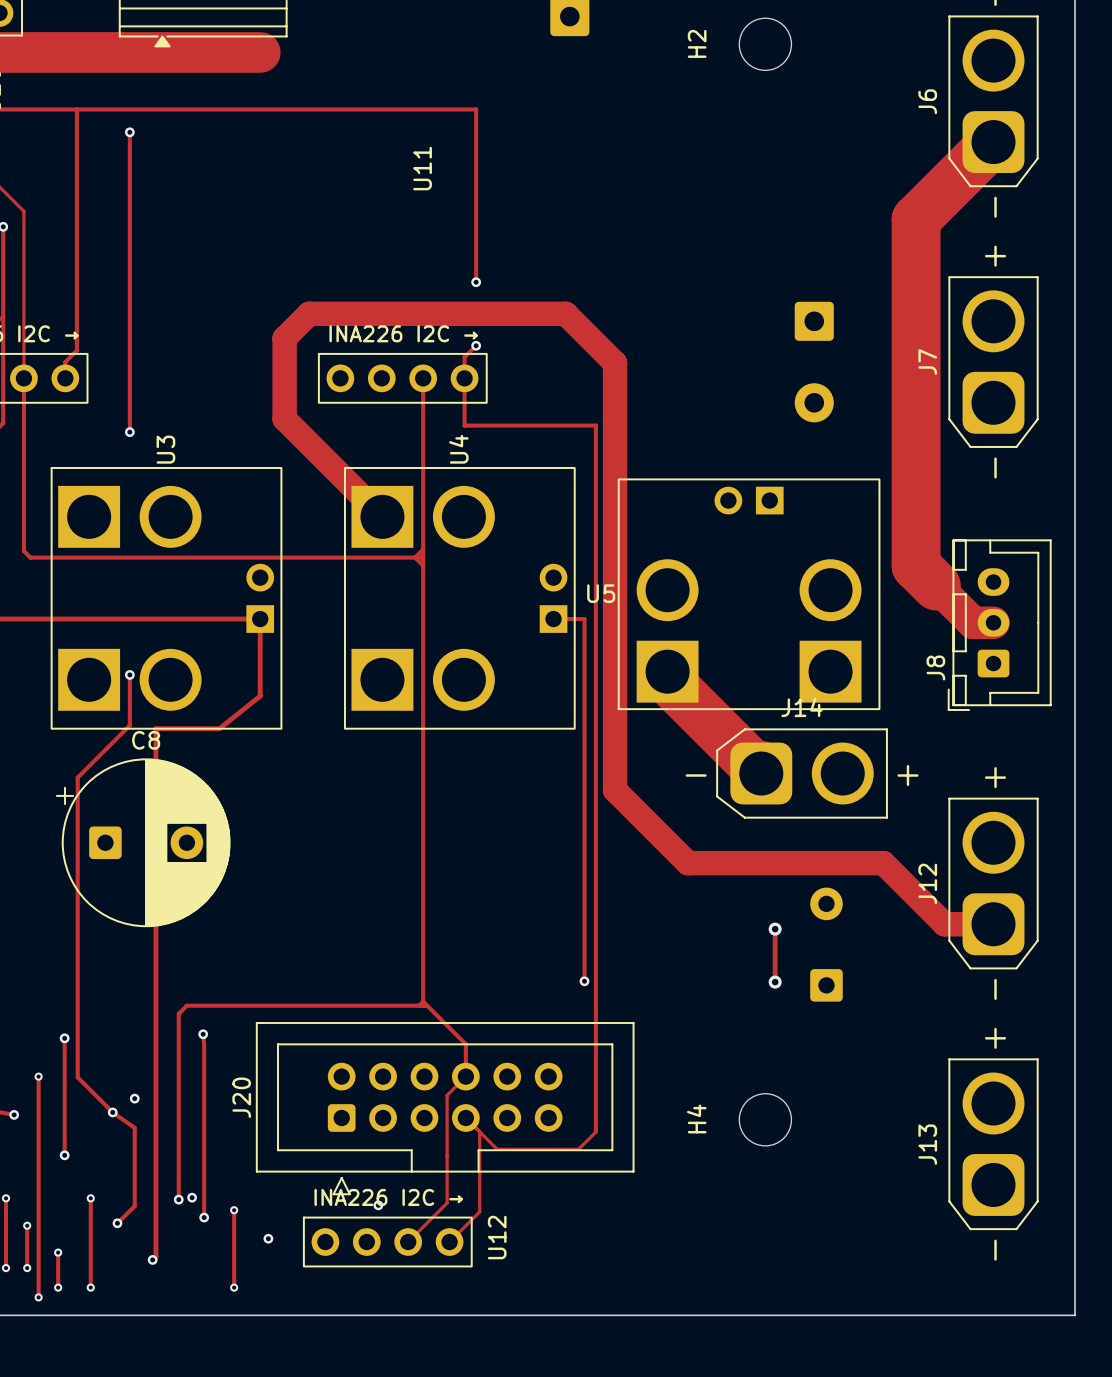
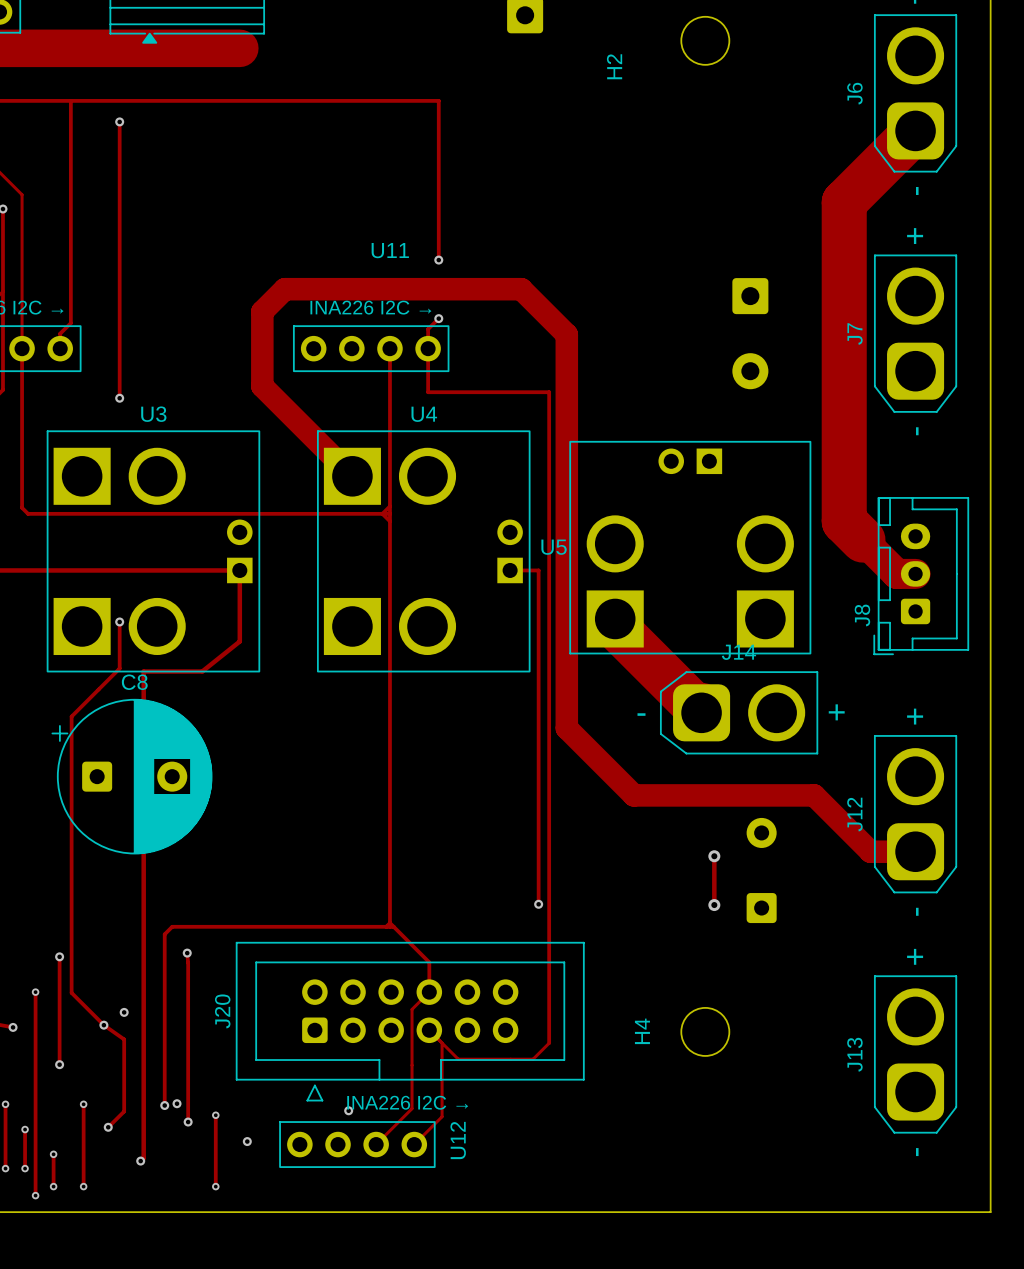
H2 name position: H2 (697, 43) -> H2 (614, 66)
U11 name rotation: 0° (422, 168) -> 90° clockwise (390, 250)
U11 name position: U11 (422, 168) -> U11 (390, 250)
U3 name rotation: 0° (165, 449) -> 90° clockwise (153, 414)
U4 name rotation: 0° (458, 449) -> 90° clockwise (424, 414)
U12 text position: INA226 I2C → (388, 1197) -> INA226 I2C → (407, 1102)

